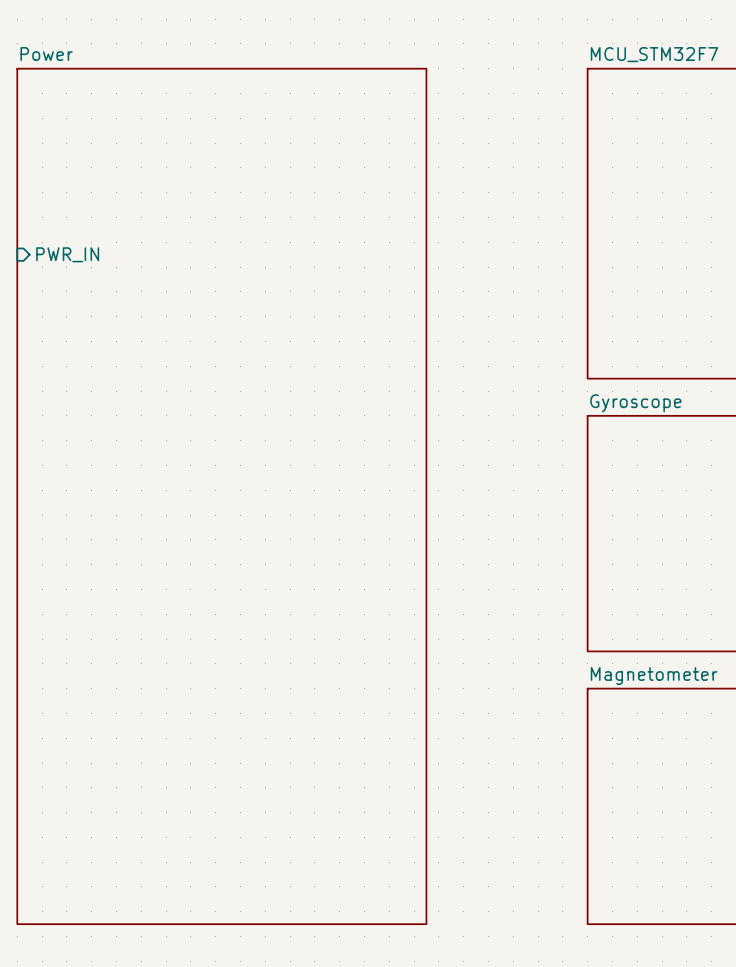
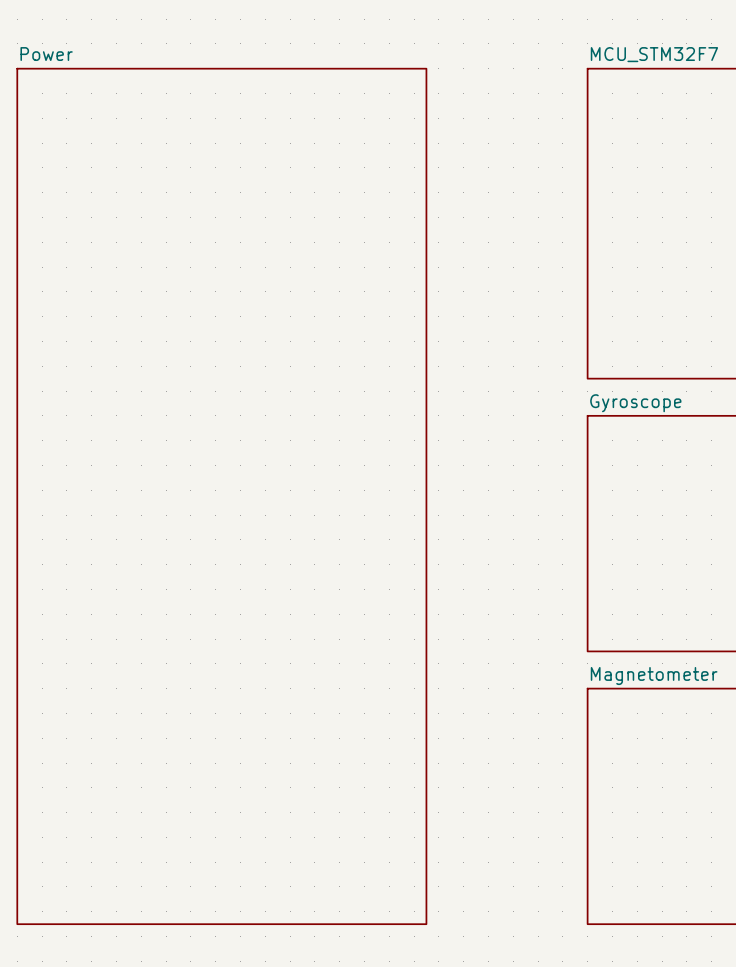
sheet pin: PWR_IN (67, 254) -> none

